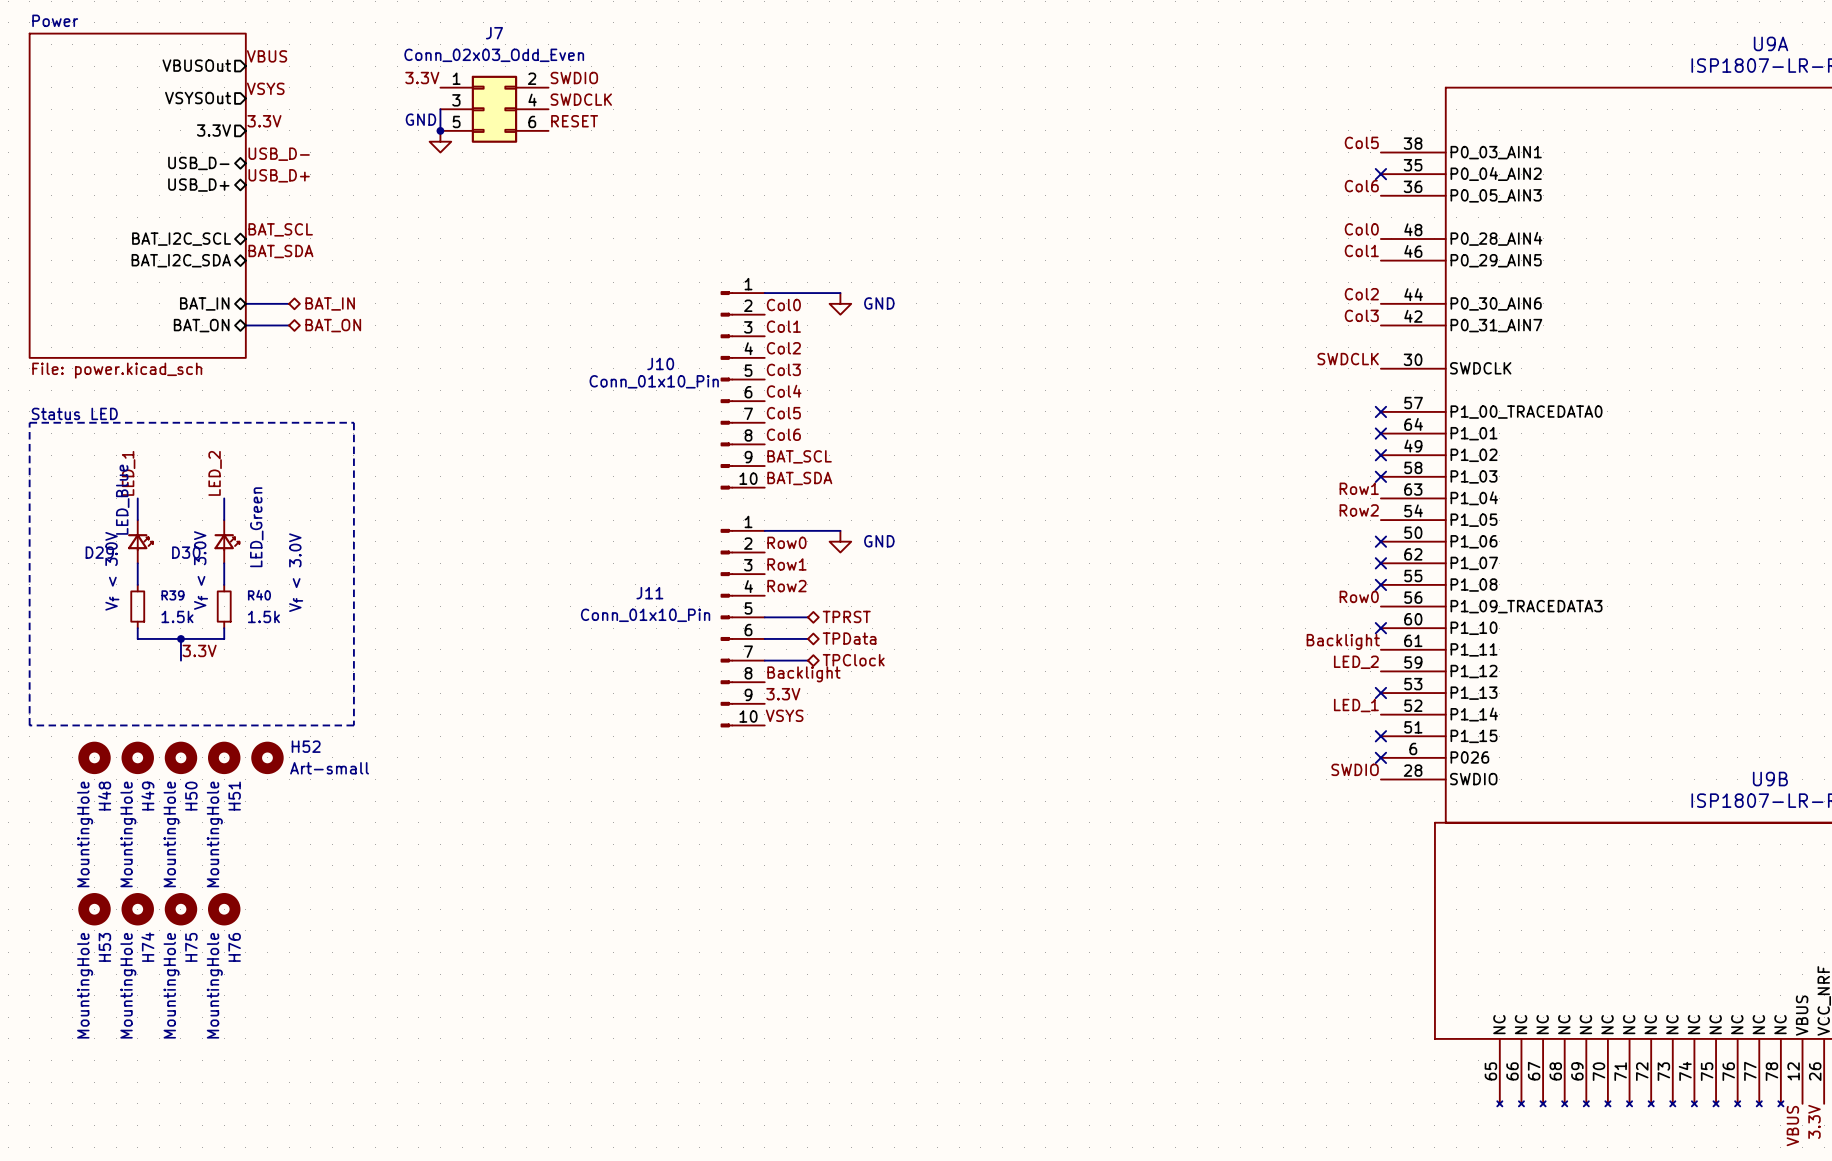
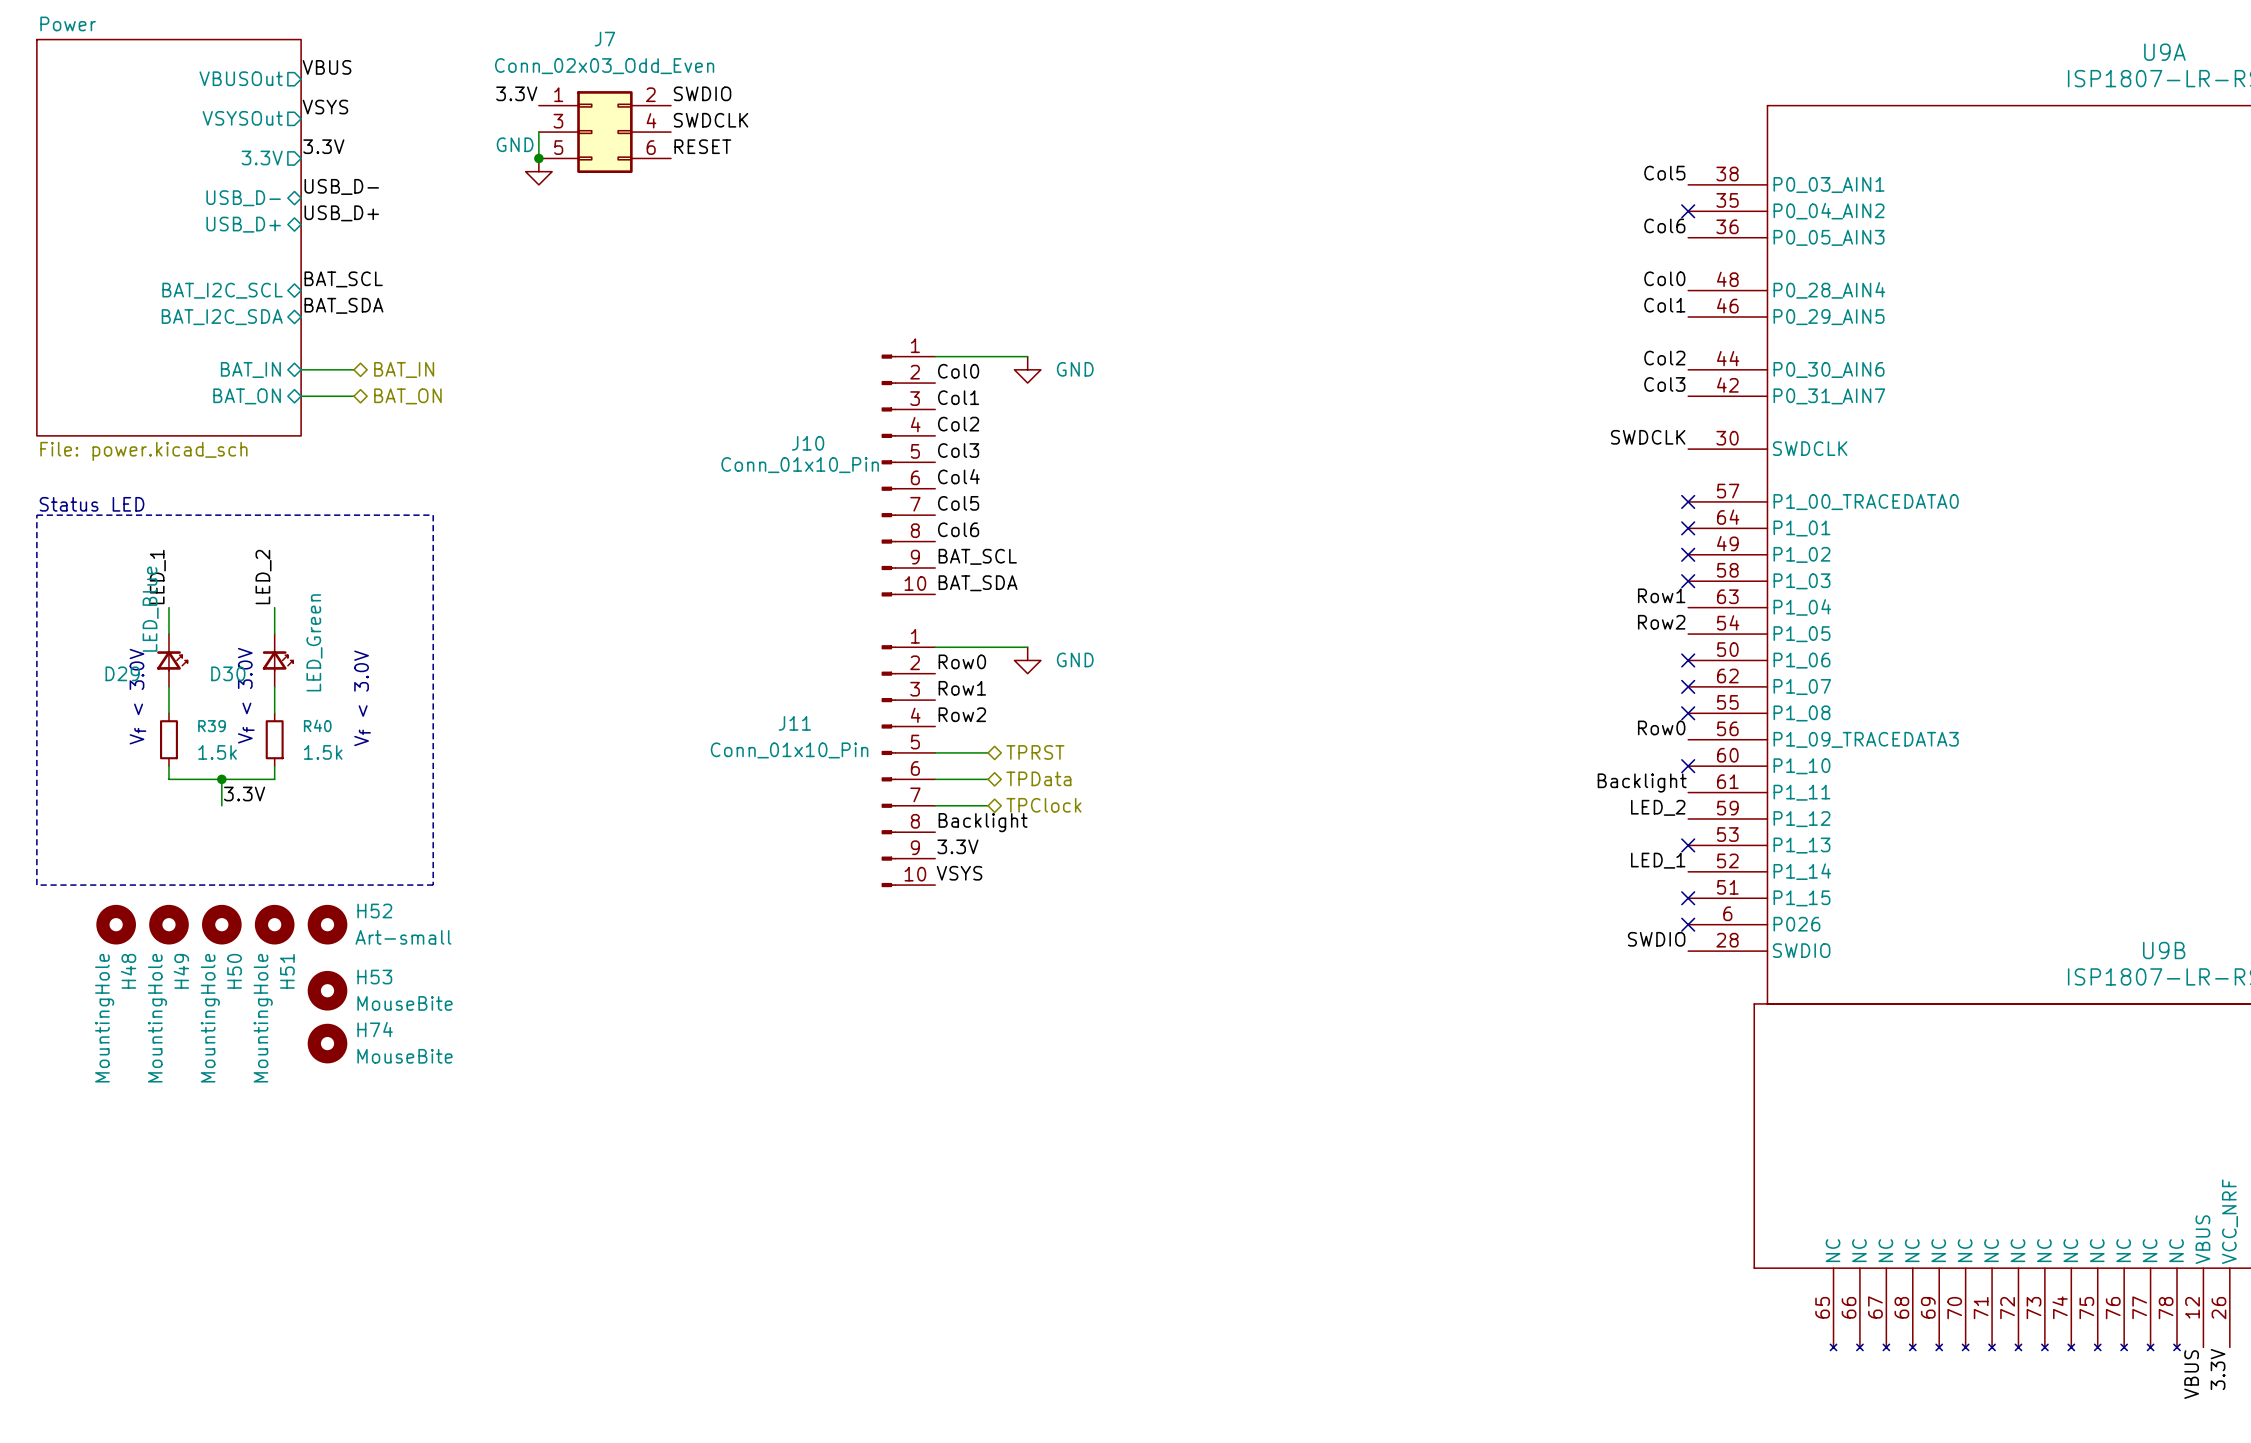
H53 position: (94, 909) -> (327, 990)
H74 position: (137, 909) -> (327, 1043)
H75: MountingHole (180, 909) -> none
H76: MountingHole (224, 909) -> none
H53 name rotation: 0° (104, 947) -> 90° clockwise (374, 977)
H53 name position: H53 (104, 947) -> H53 (374, 977)
H74 name rotation: 0° (147, 947) -> 90° clockwise (375, 1029)
H74 name position: H74 (147, 947) -> H74 (375, 1029)
H53 value: MountingHole (85, 985) -> MouseBite (404, 1003)
H74 value: MountingHole (128, 985) -> MouseBite (404, 1056)

